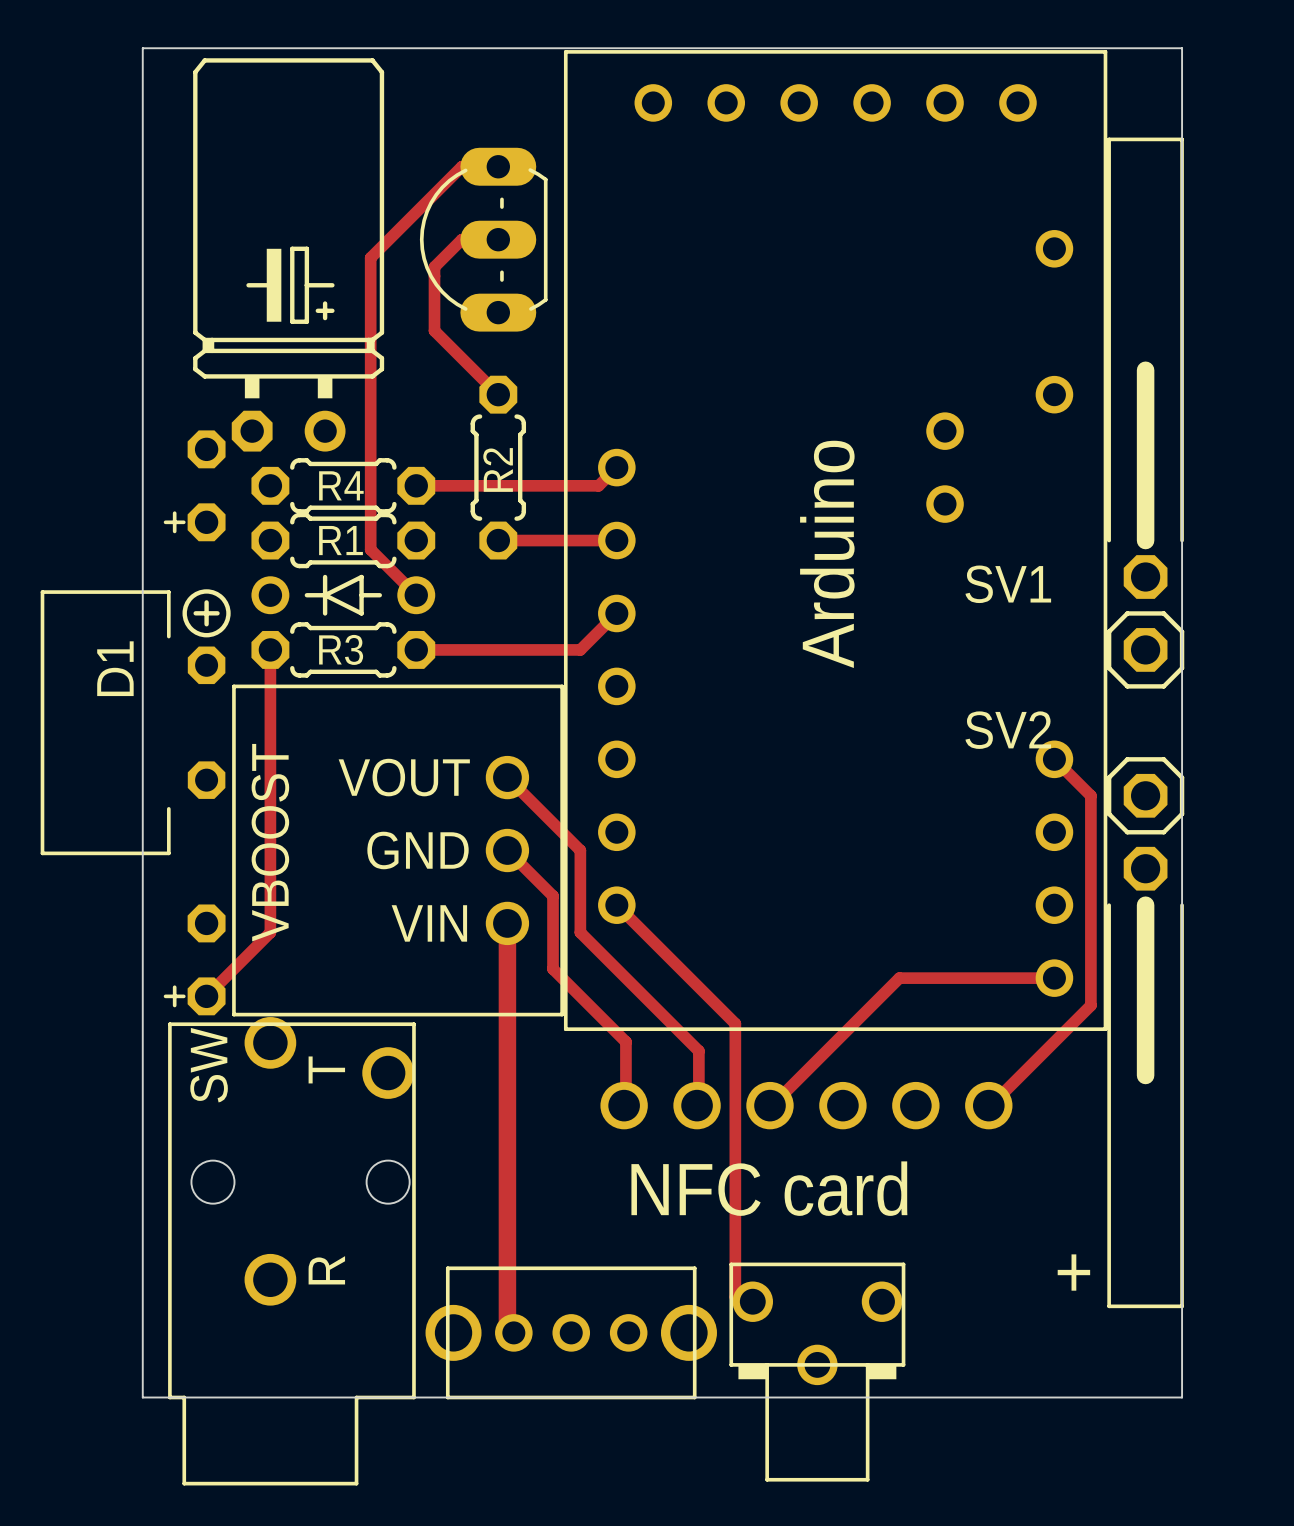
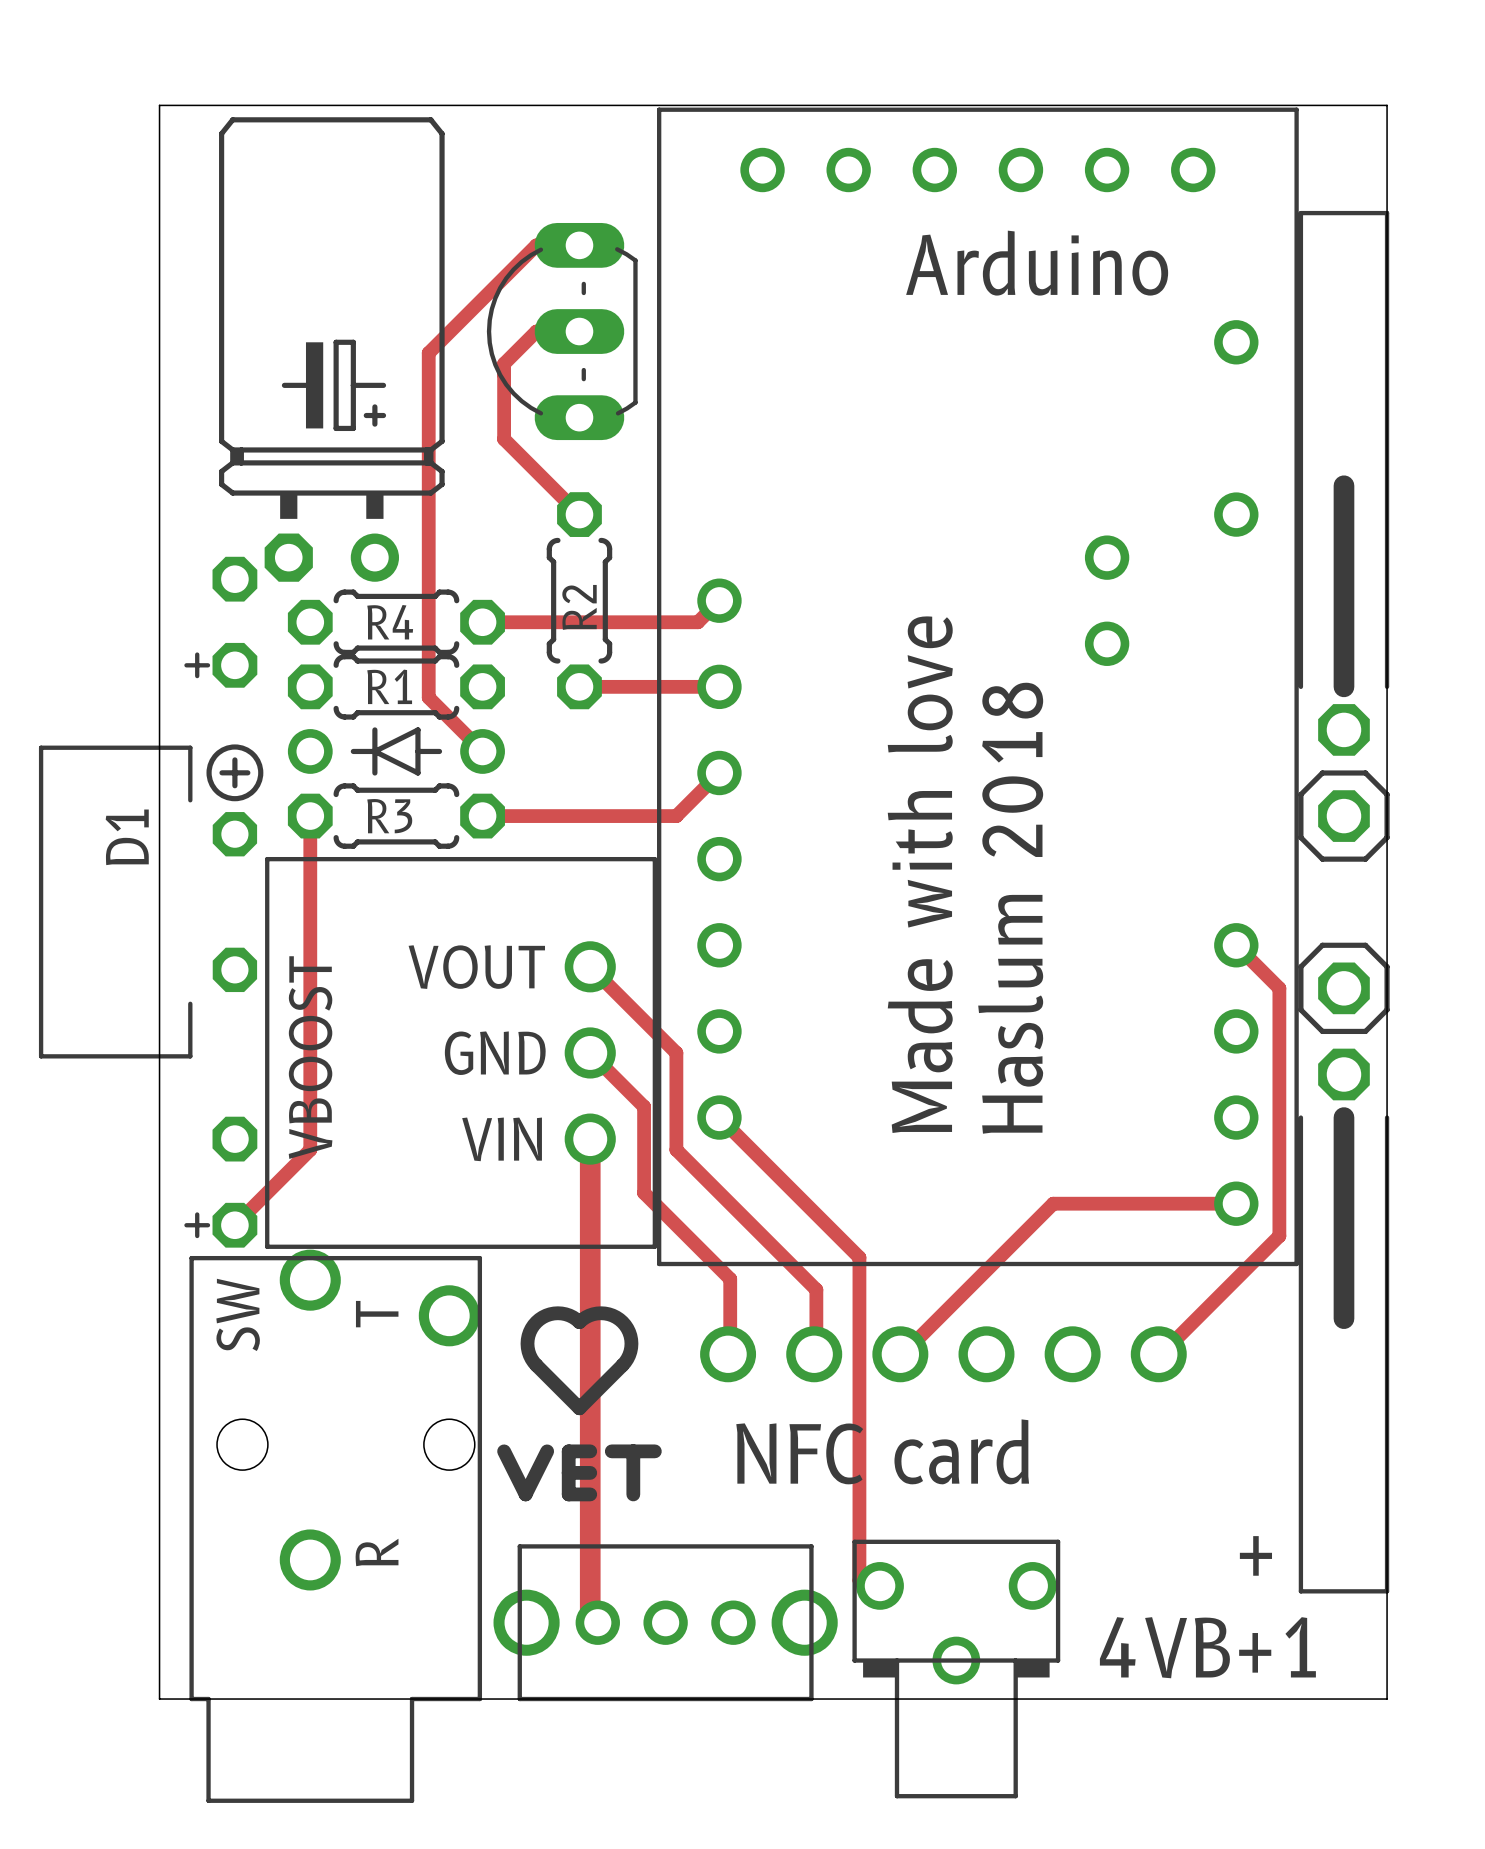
text rotation: 0° (827, 554) -> 90° clockwise (1037, 263)
SV1 name: SV1 (1008, 584) -> none
text: none -> Made with love (920, 874)
text: none -> Haslum 2018 (1010, 908)
SV2 name: SV2 (1008, 730) -> none
line: none -> (579, 1322) (565, 1314) (557, 1313) (546, 1315) (533, 1325) (529, 1332) (527, 1343) (529, 1355) (533, 1362) (579, 1408) (625, 1362) (629, 1355) (631, 1343) (629, 1332) (625, 1325) (612, 1315) (601, 1313) (593, 1314) (579, 1322)
line: none -> (504, 1451) (525, 1494) (547, 1451)
line: none -> (590, 1451) (568, 1451) (568, 1494) (590, 1494)
line: none -> (611, 1451) (654, 1451)
line: none -> (633, 1451) (633, 1494)
line: none -> (568, 1472) (590, 1472)
text: none -> 4VB+1 (1207, 1647)

